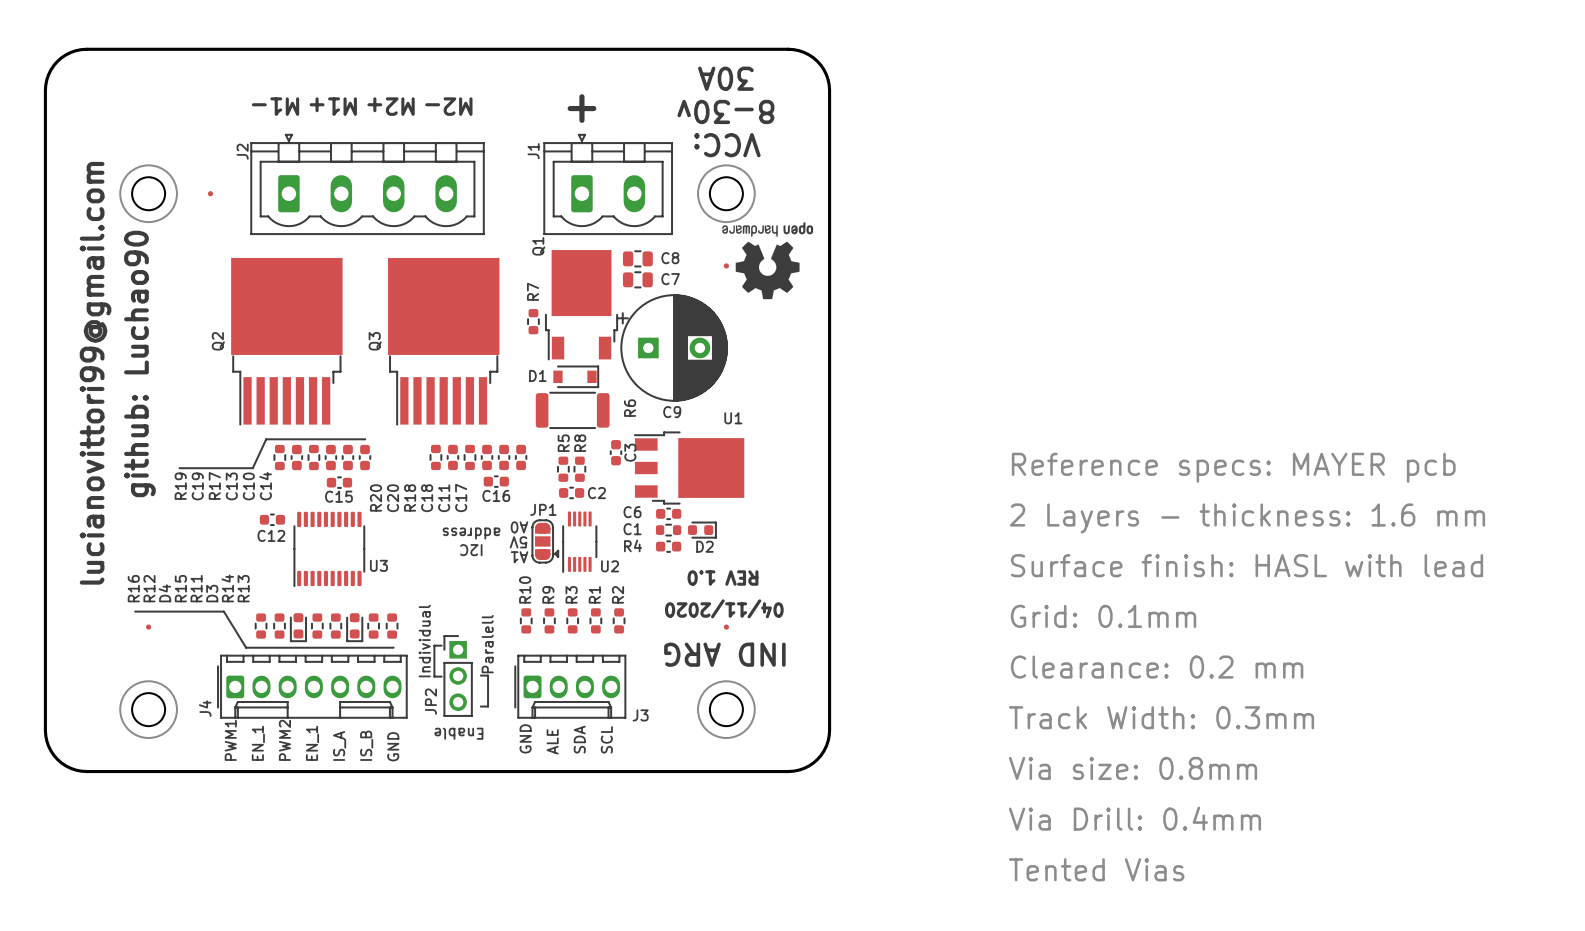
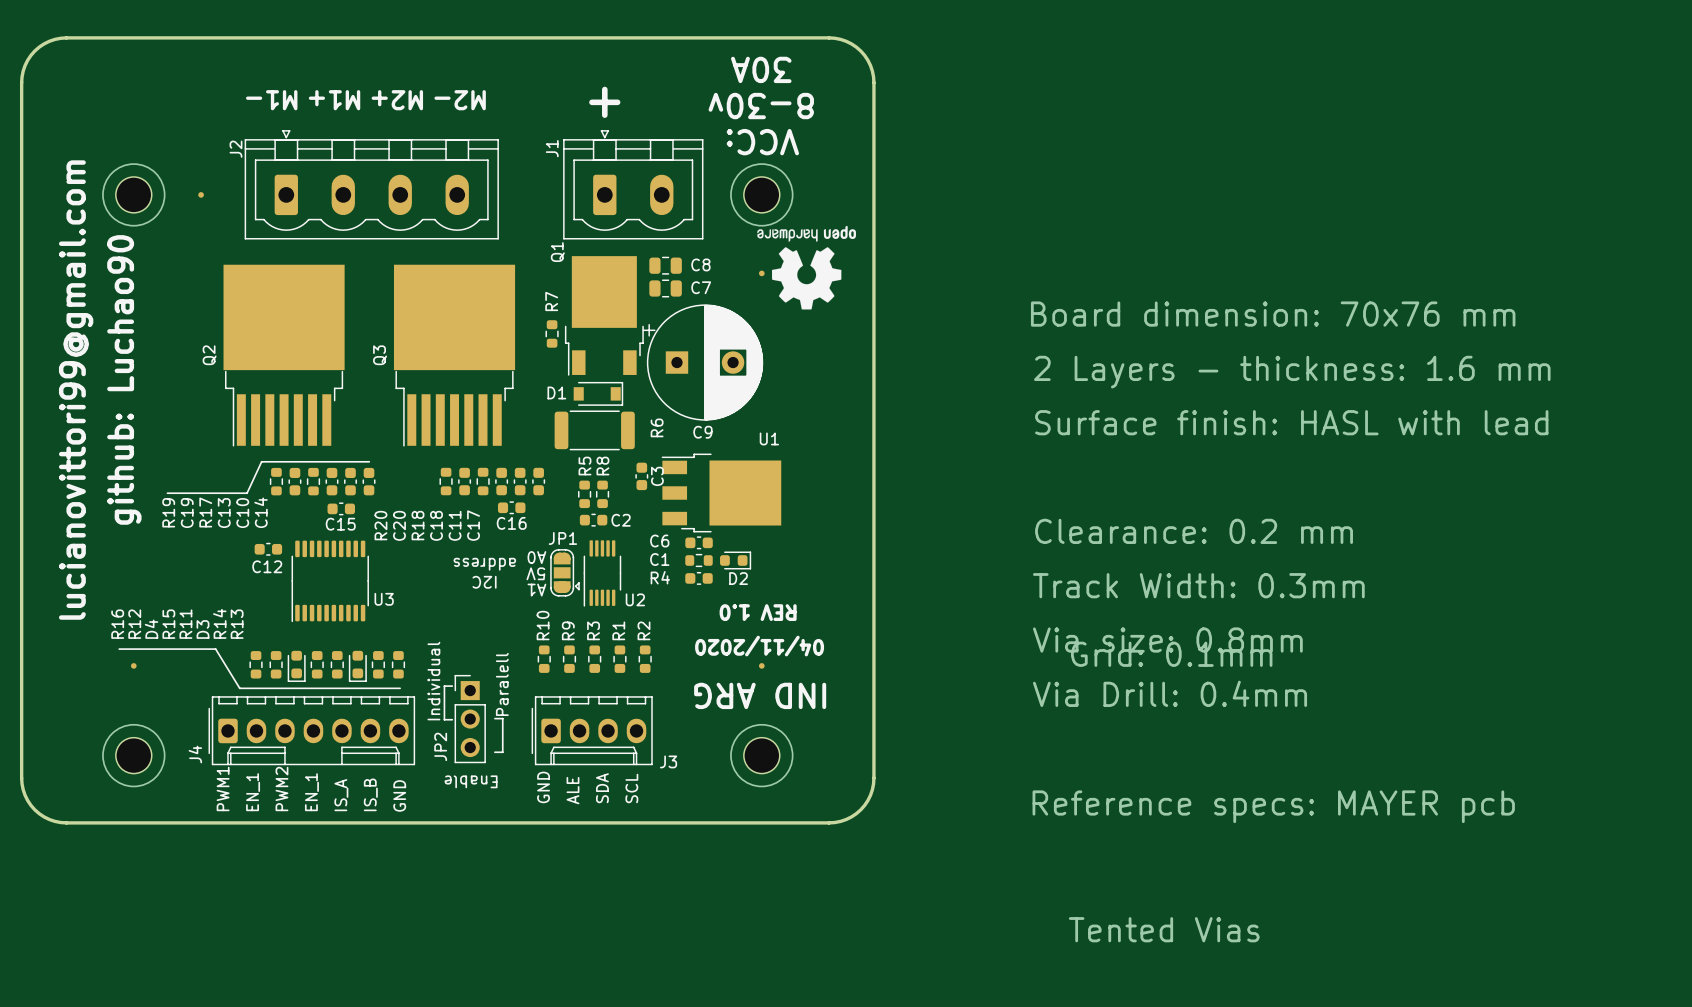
text: none -> Board dimension: 70x76 mm (1273, 314)
text: Reference specs: MAYER pcb (1233, 467) -> none
text position: 2 Layers - thickness: 1.6 mm (1247, 518) -> 2 Layers - thickness: 1.6 mm (1292, 372)
text position: Surface finish: HASL with lead (1247, 565) -> Surface finish: HASL with lead (1291, 422)
text position: Clearance: 0.2 mm (1157, 667) -> Clearance: 0.2 mm (1194, 531)
text position: Track Width: 0.3mm (1161, 717) -> Track Width: 0.3mm (1198, 585)
text: none -> Reference specs: MAYER pcb (1273, 806)
text position: Via size: 0.8mm (1133, 768) -> Via size: 0.8mm (1167, 640)
text position: Via Drill: 0.4mm (1134, 818) -> Via Drill: 0.4mm (1170, 693)

